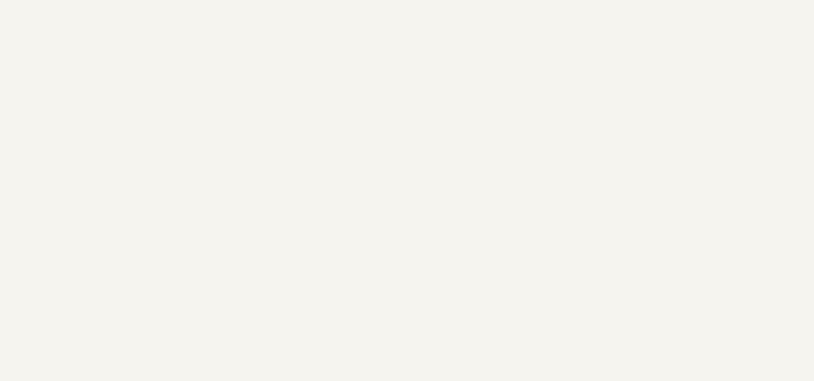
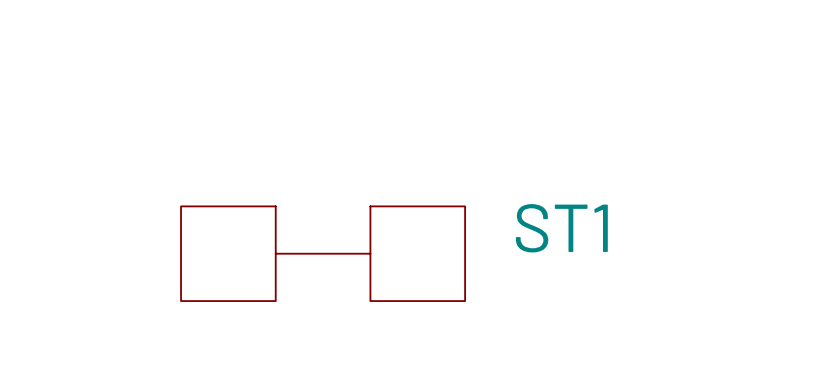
ST1: none -> (323, 253)

